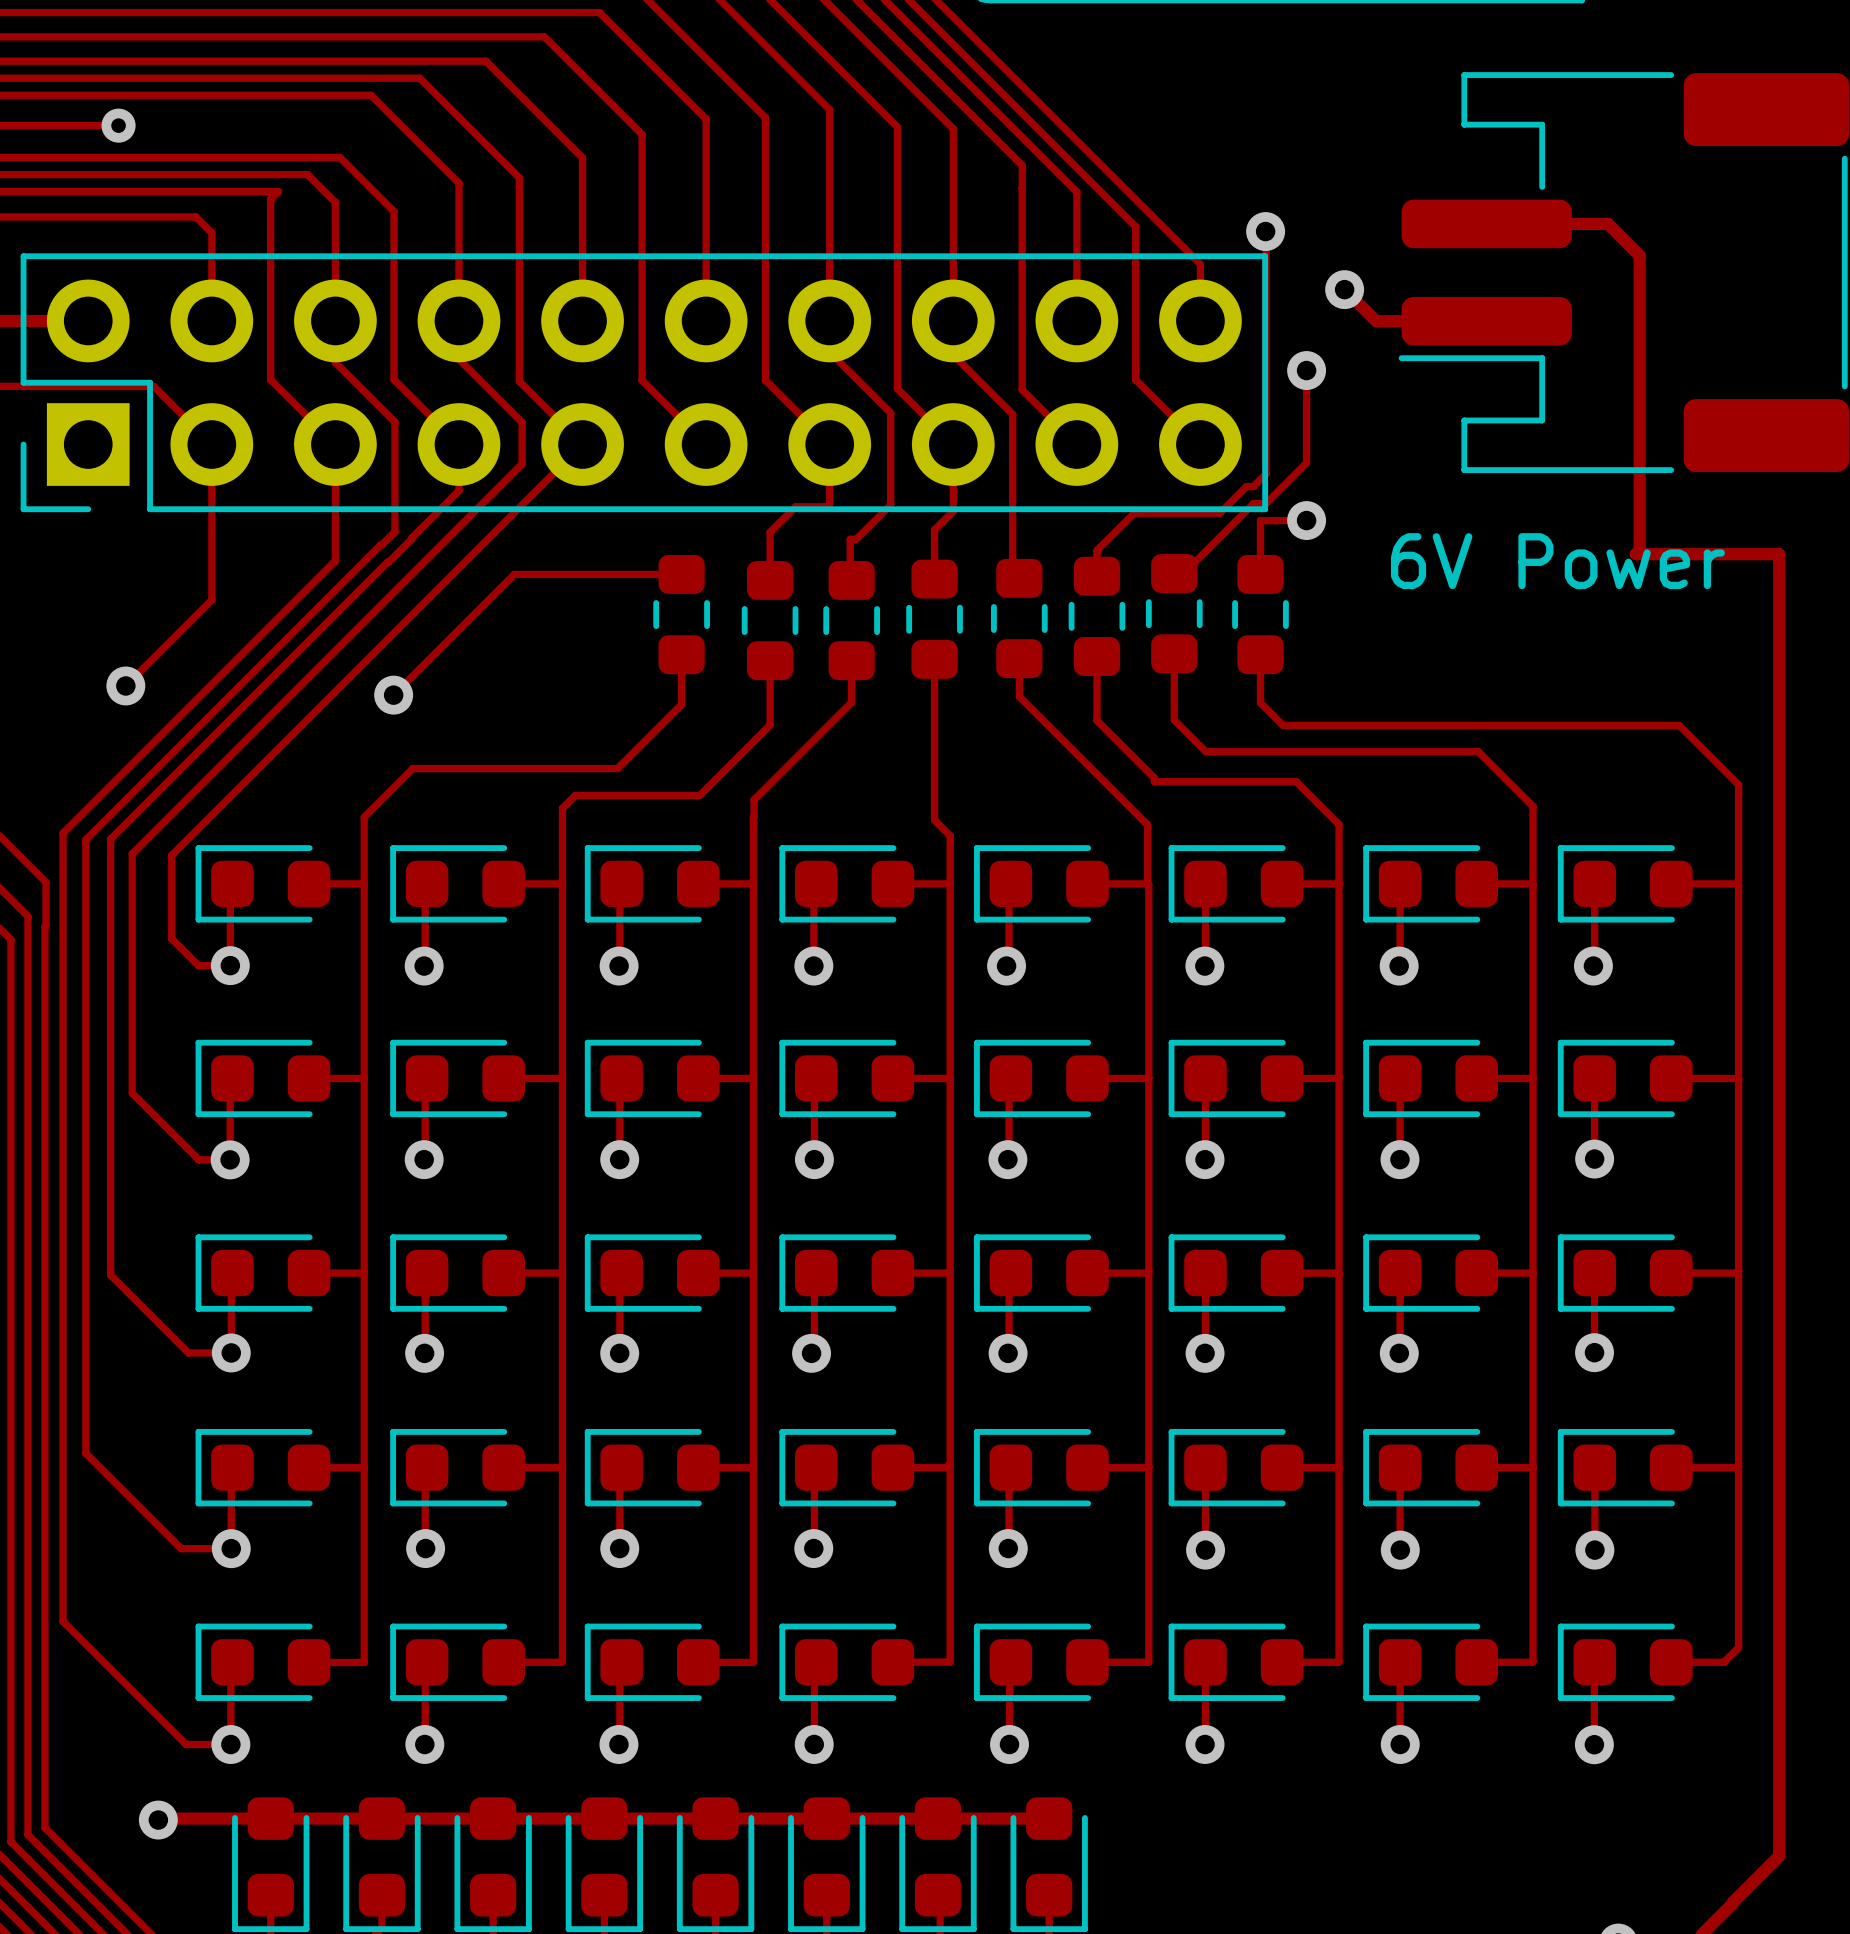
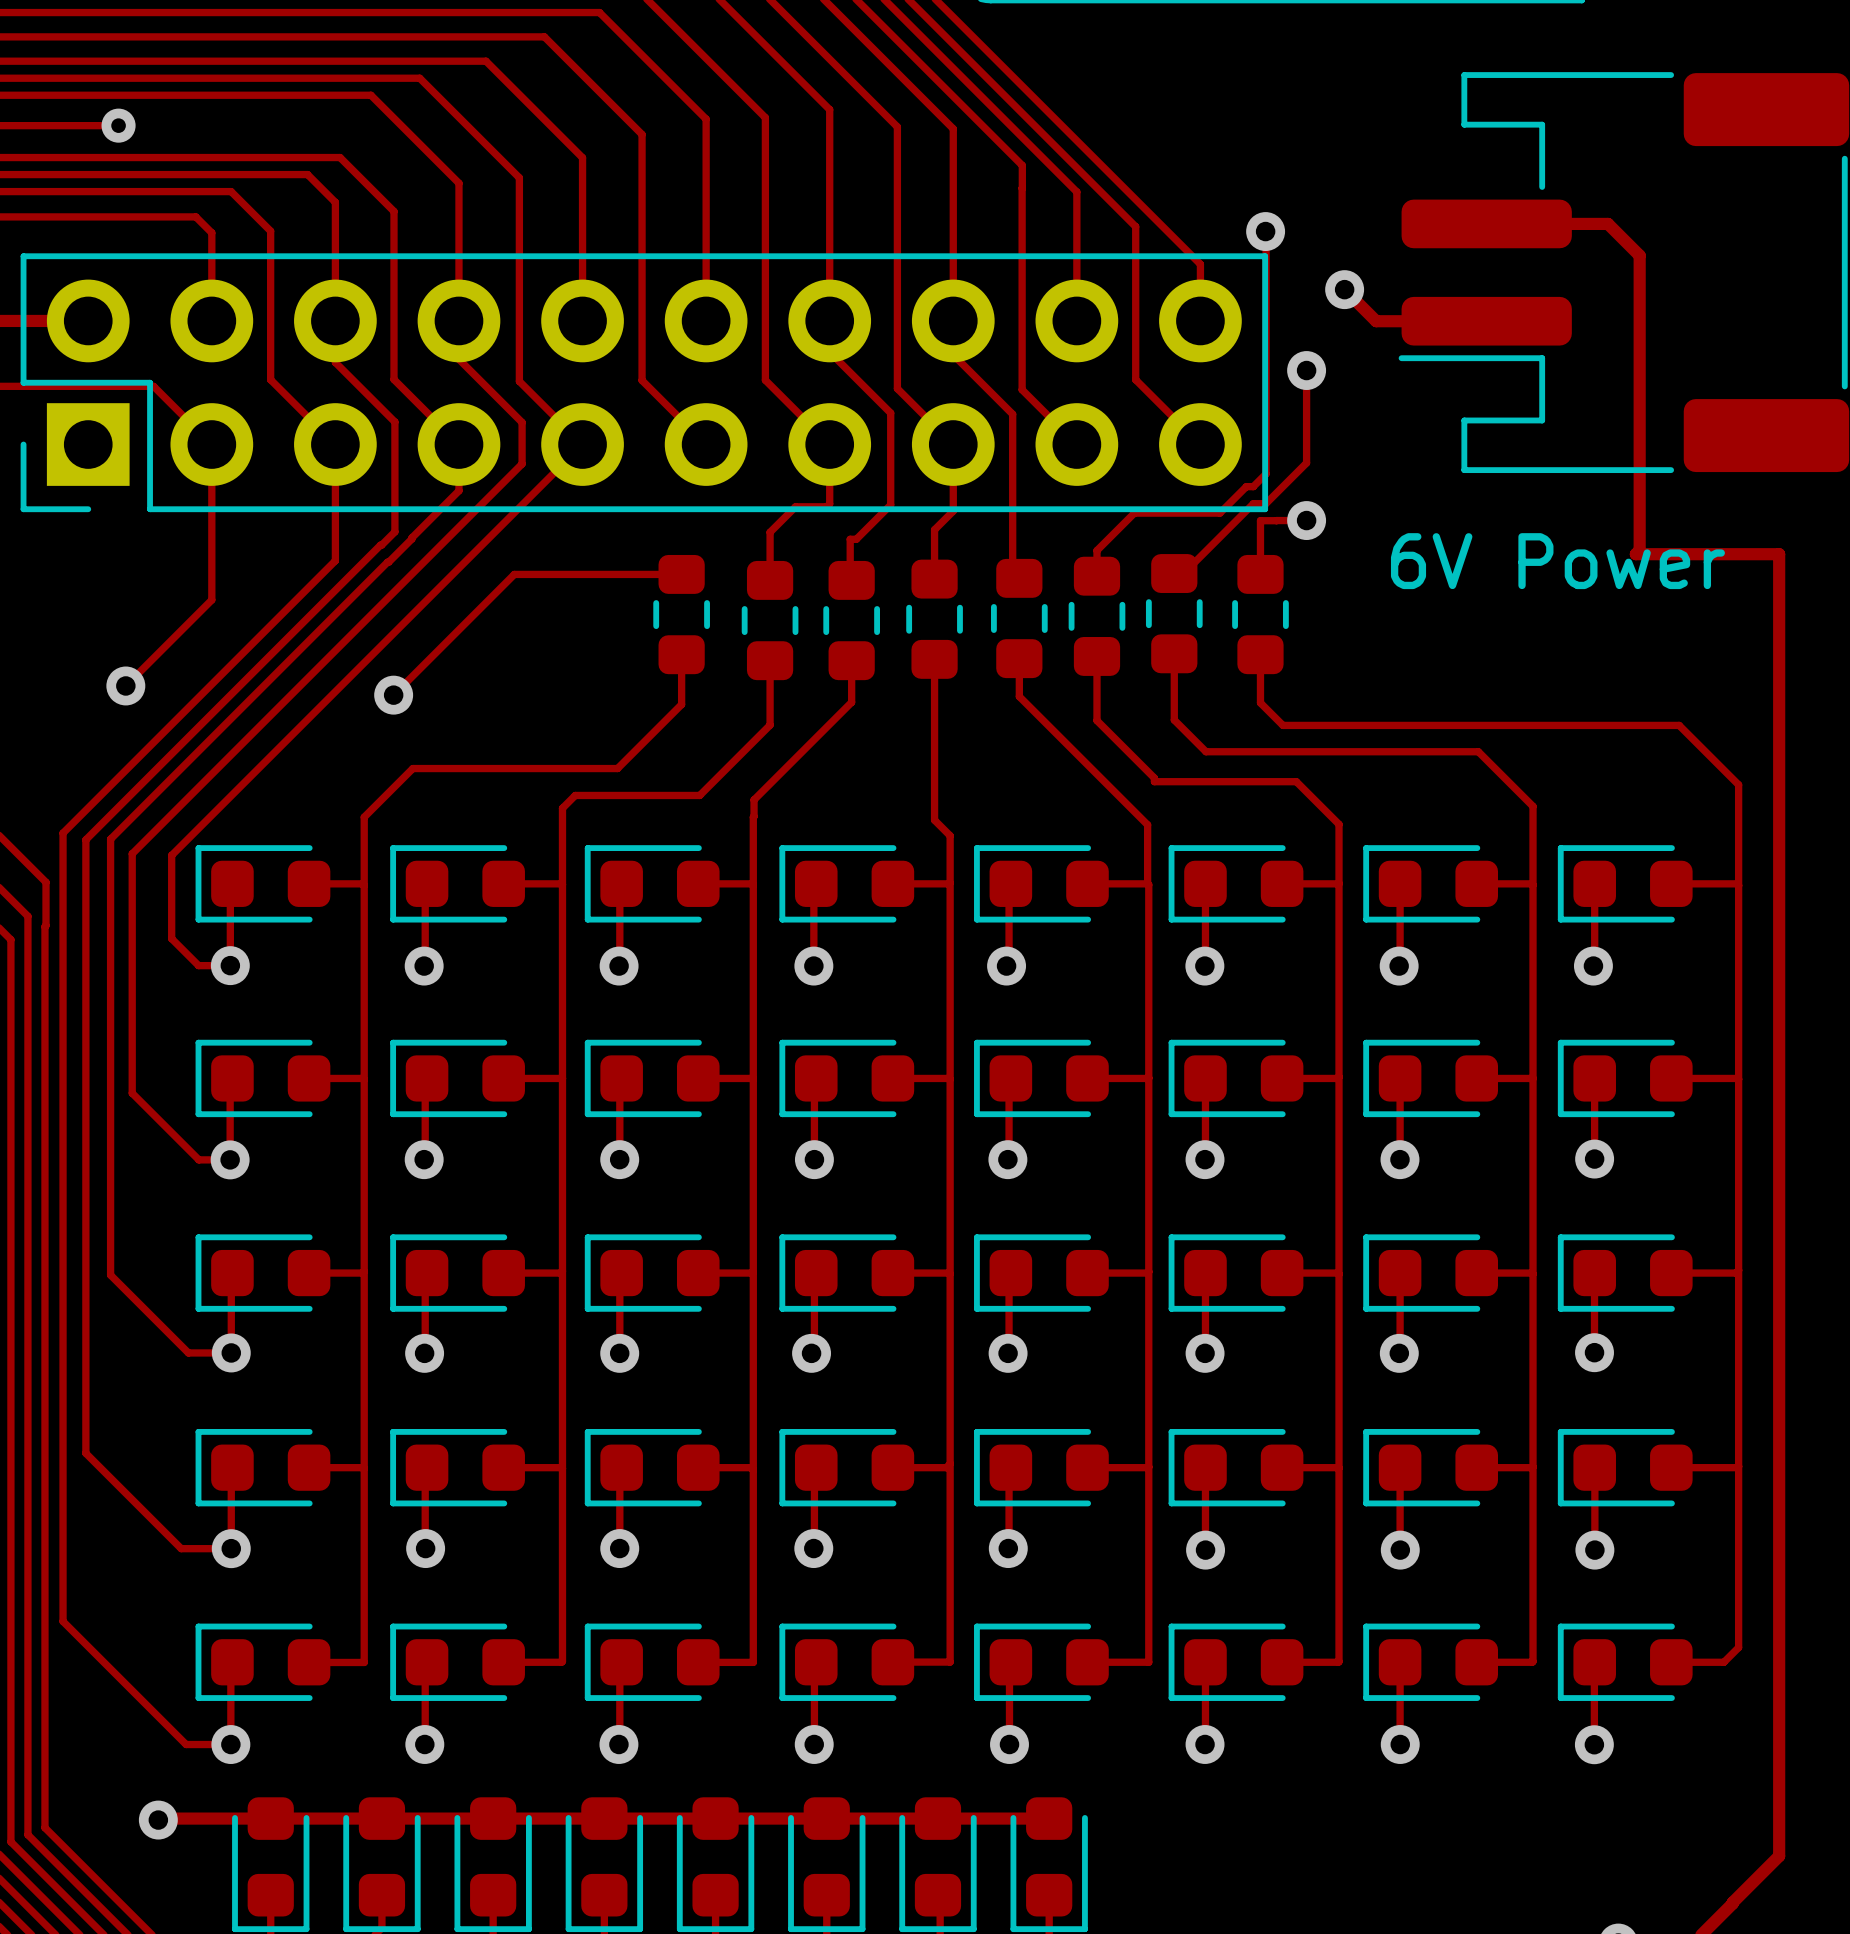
track: (231, 191) (278, 191) (270, 199) (270, 231) -> (231, 191) (270, 231)

